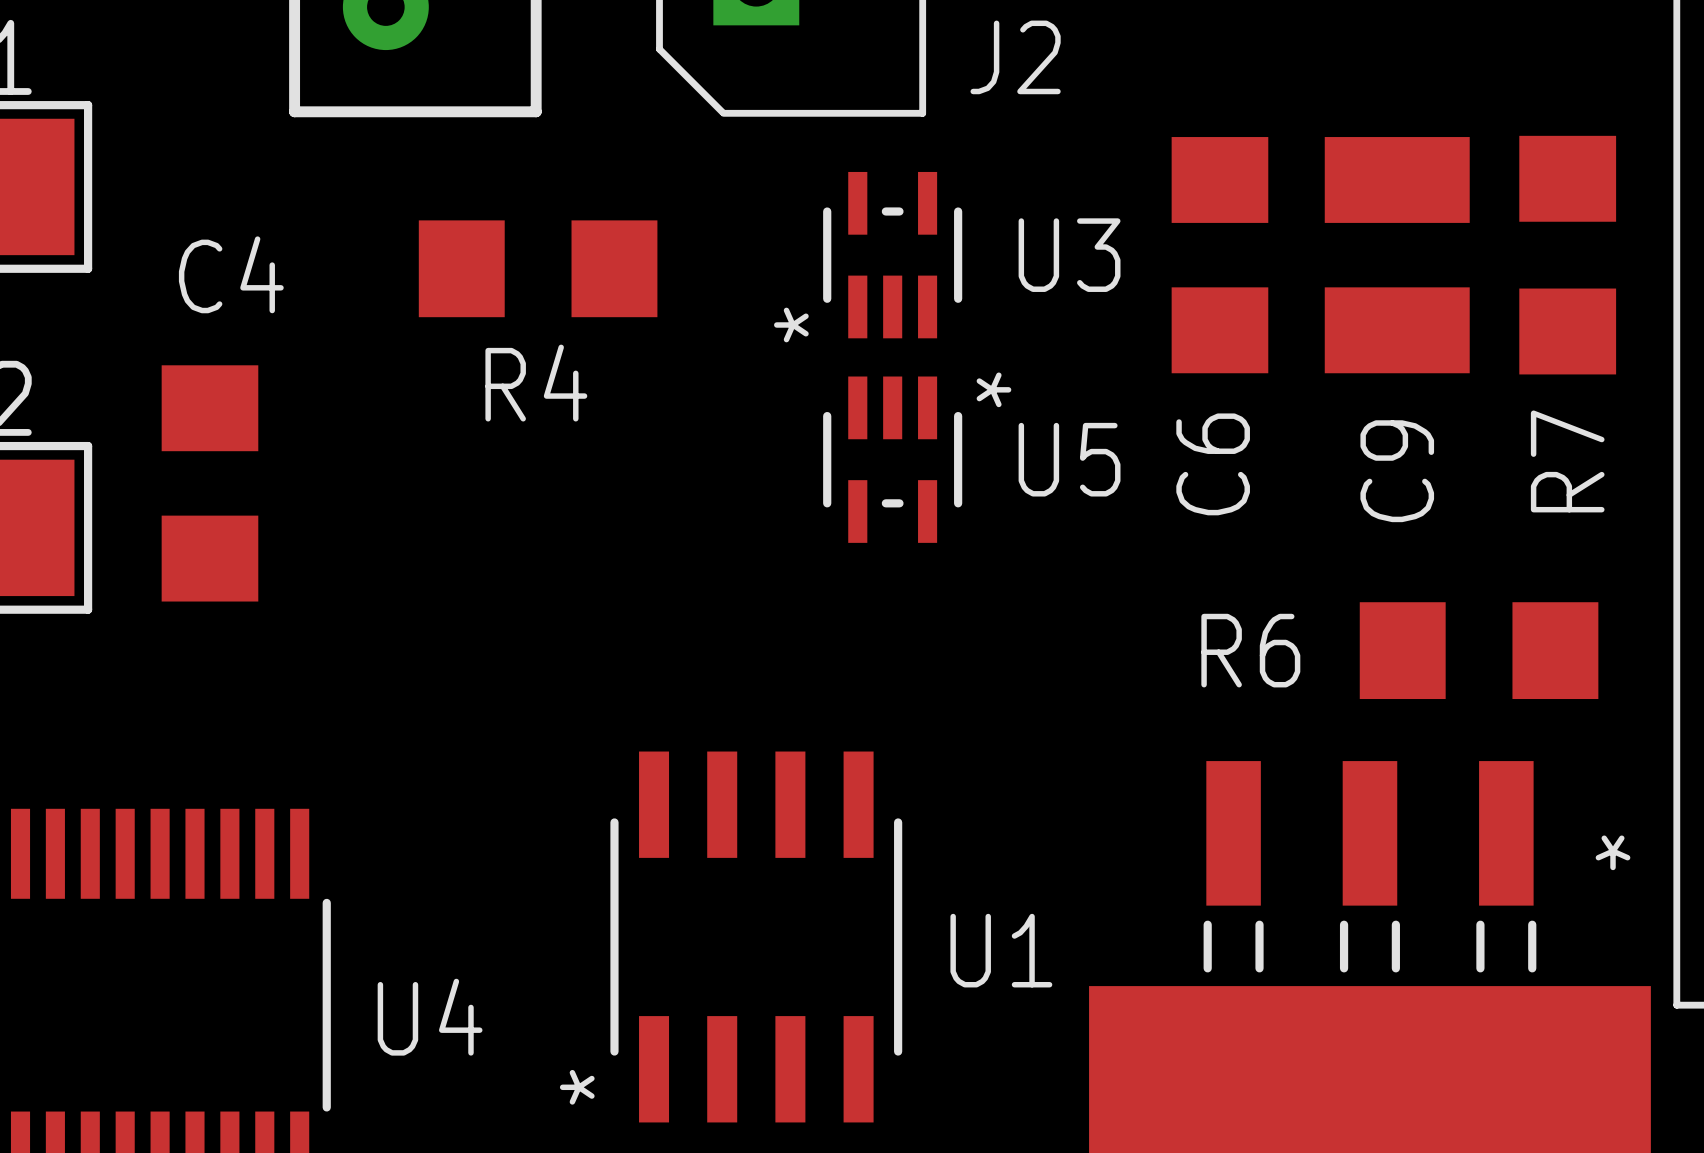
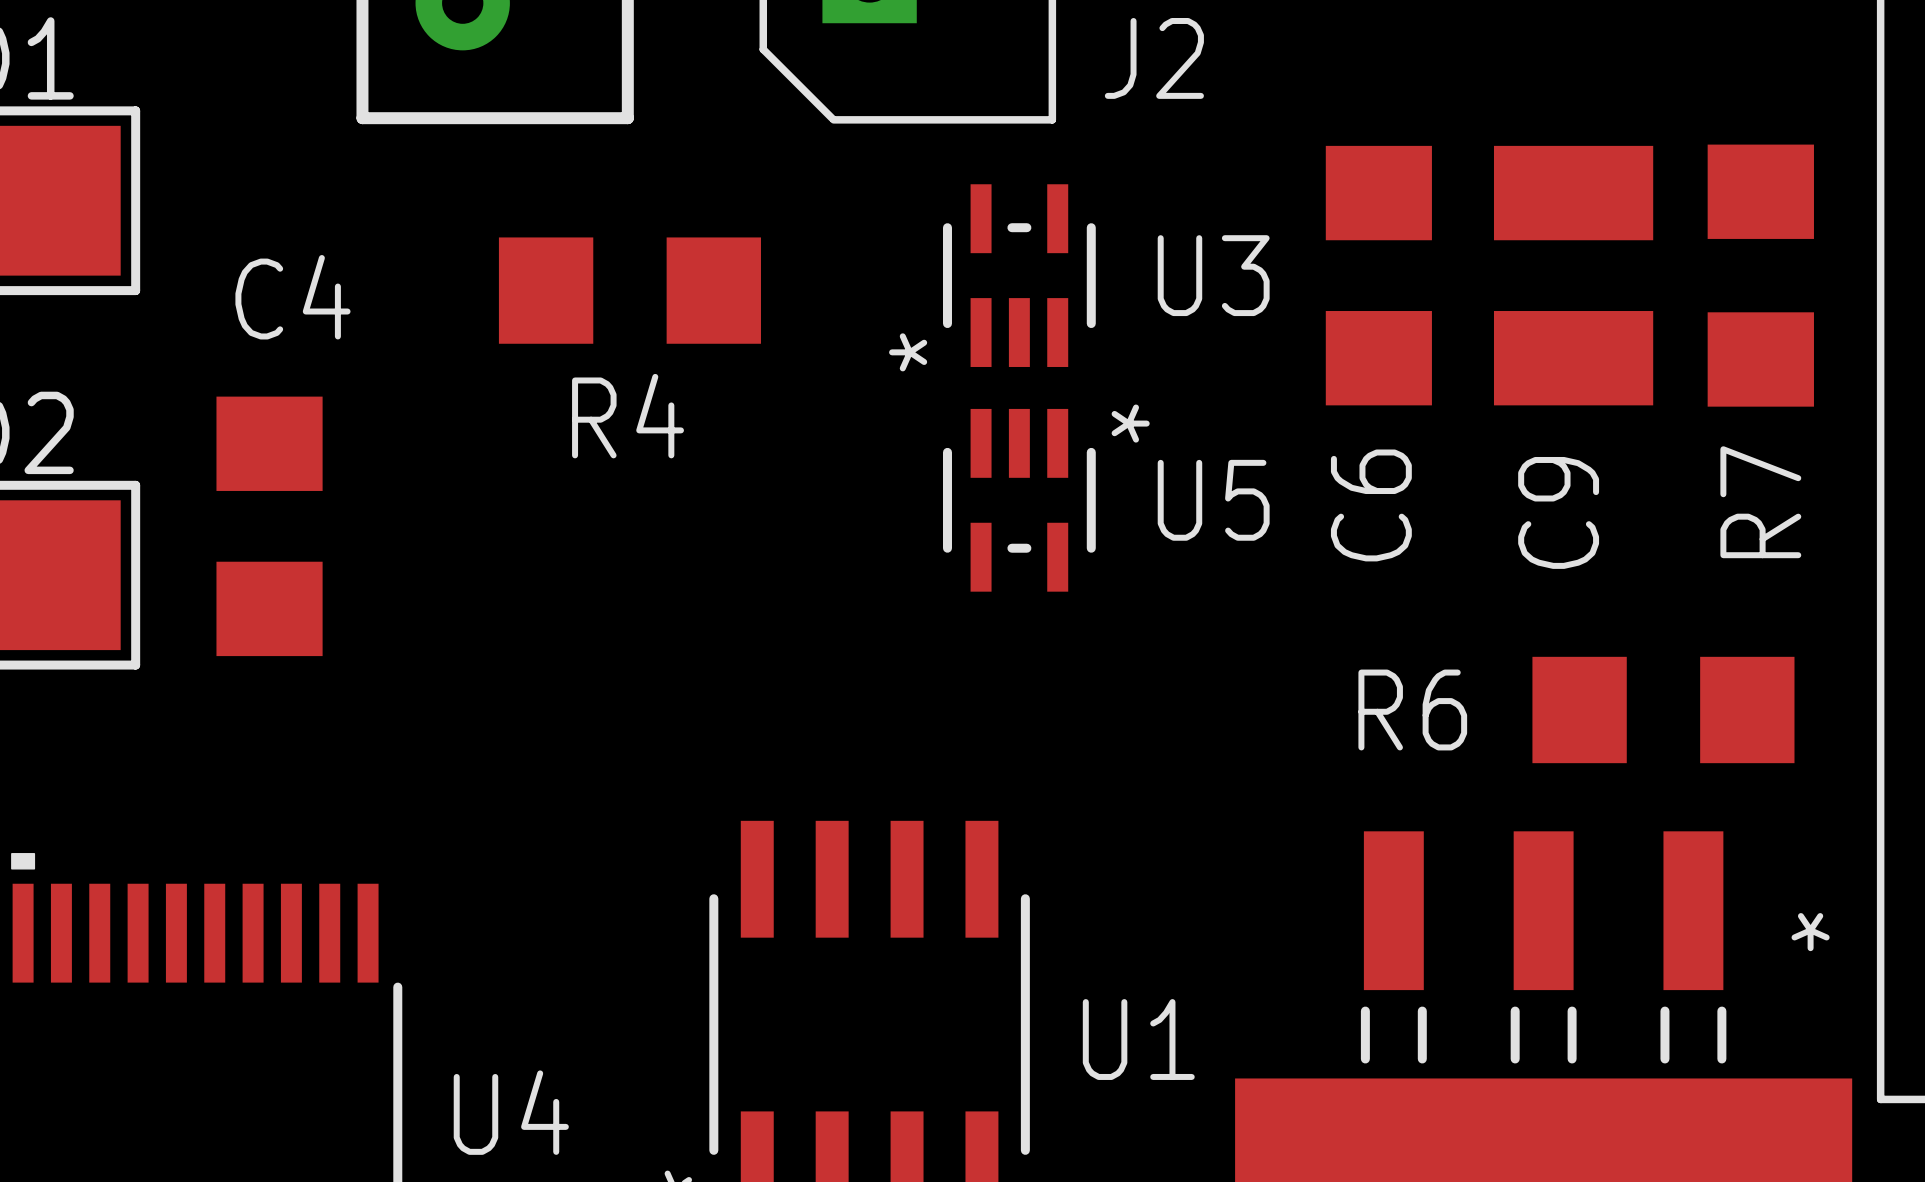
C9 name position: C9 (1397, 471) -> C9 (1558, 512)

